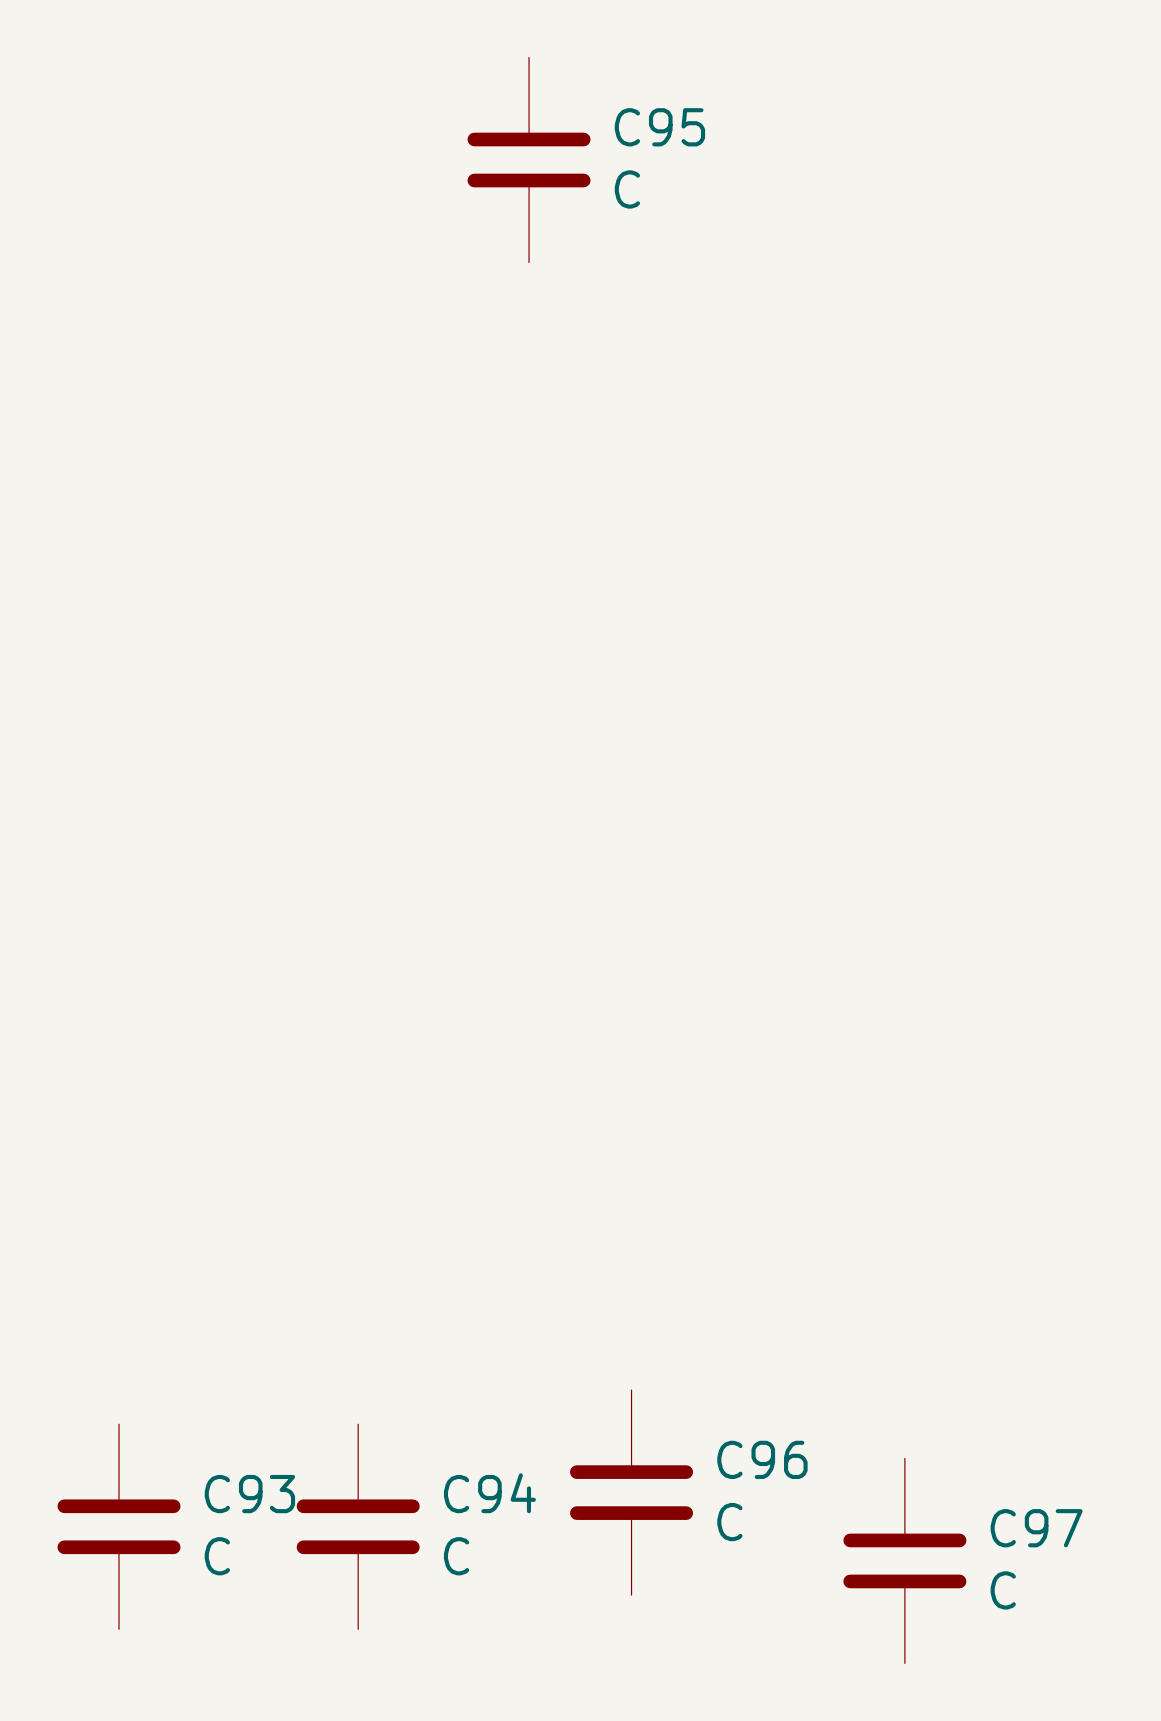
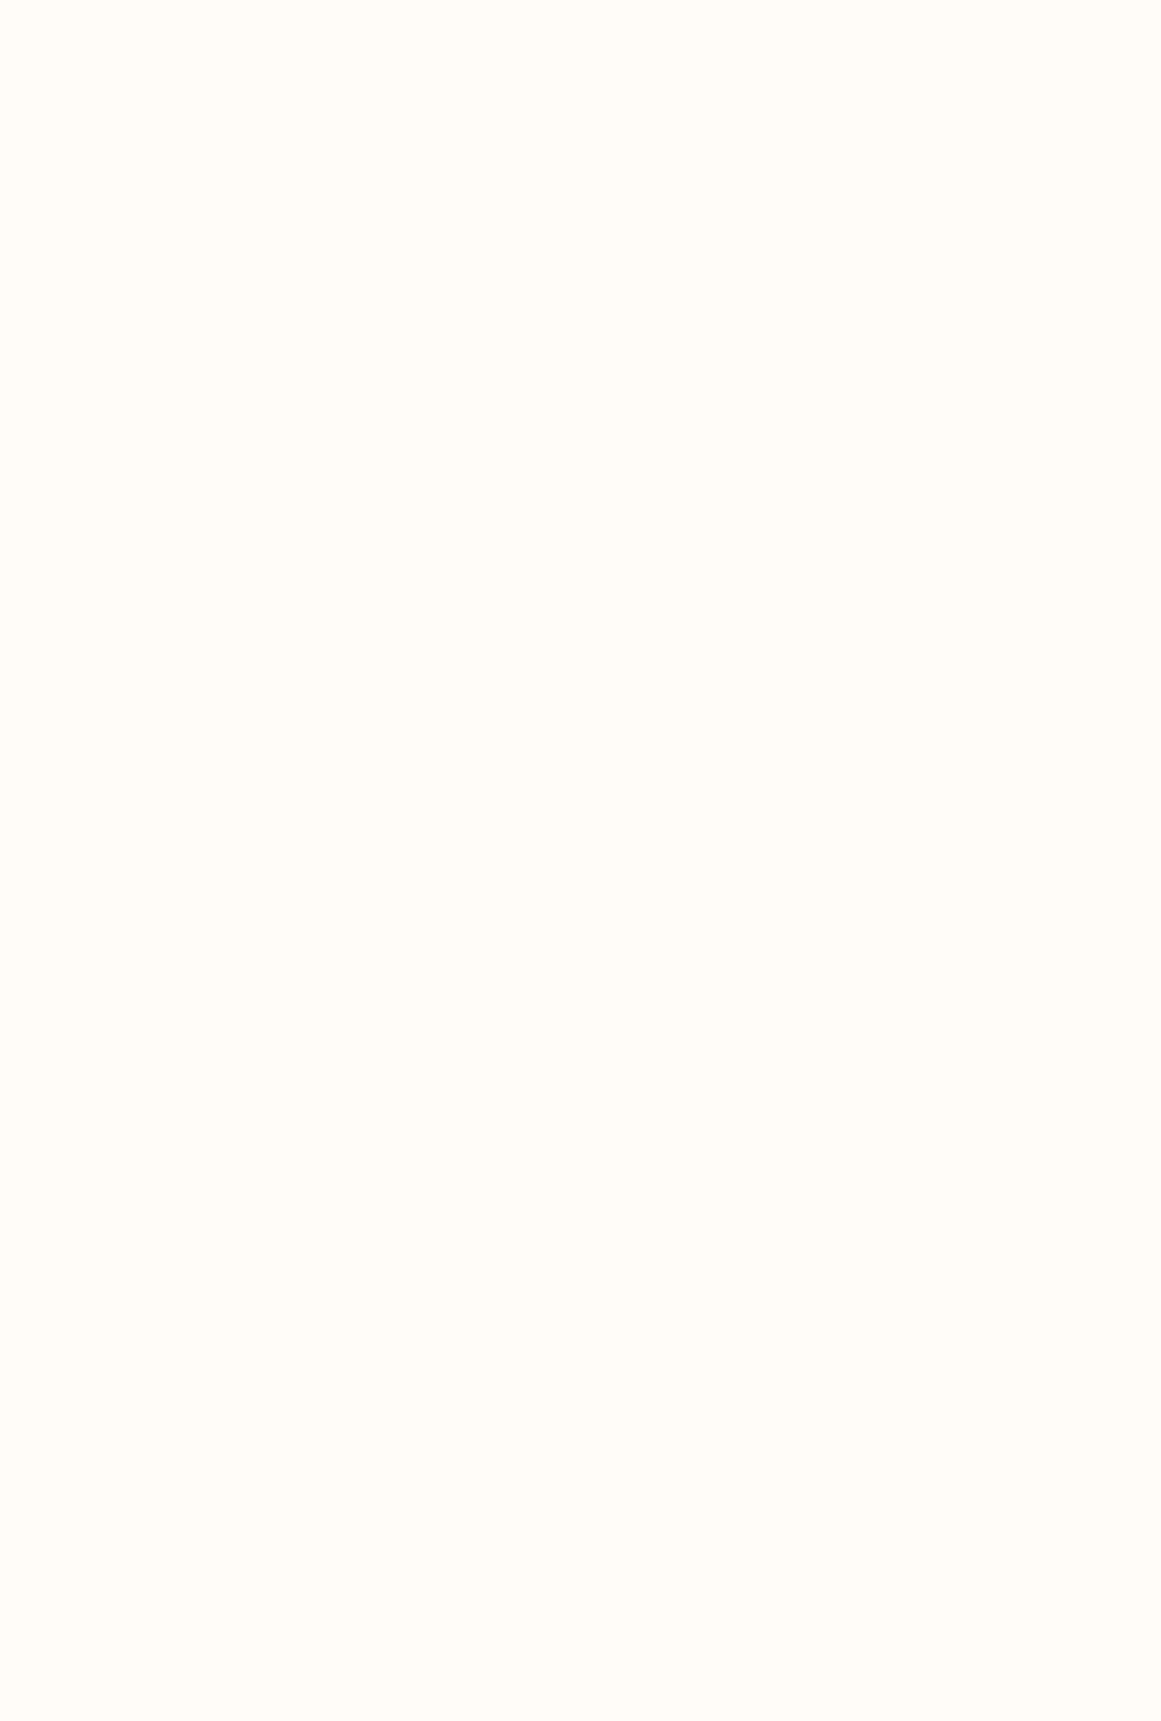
C95: C (529, 160) -> none
C96: C (631, 1492) -> none
C93: C (119, 1526) -> none
C94: C (358, 1526) -> none
C97: C (904, 1560) -> none

